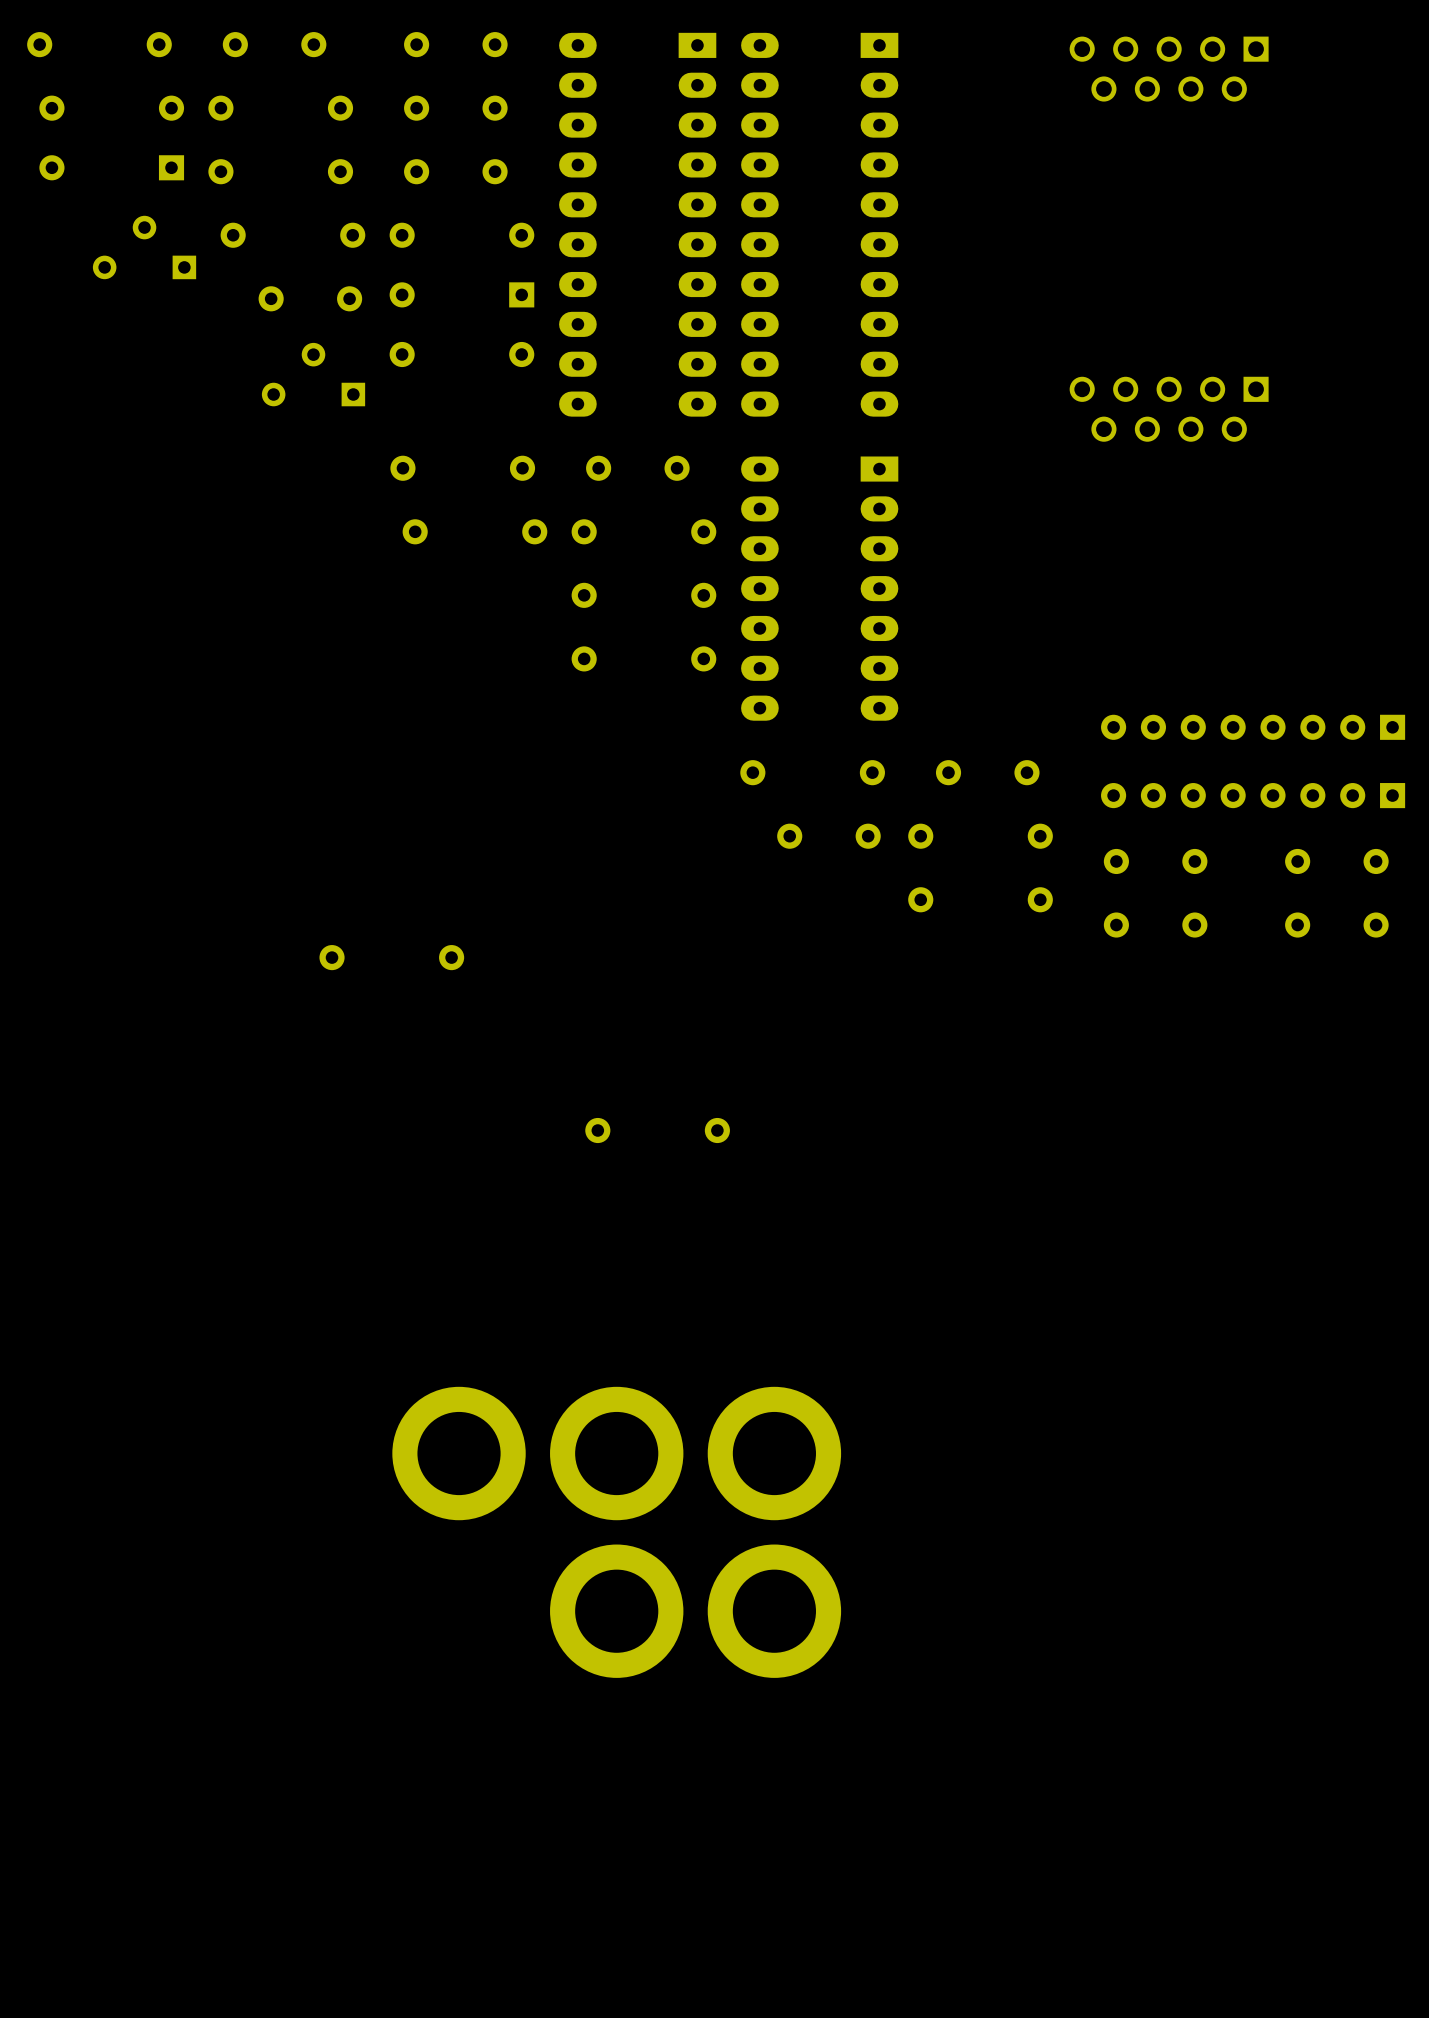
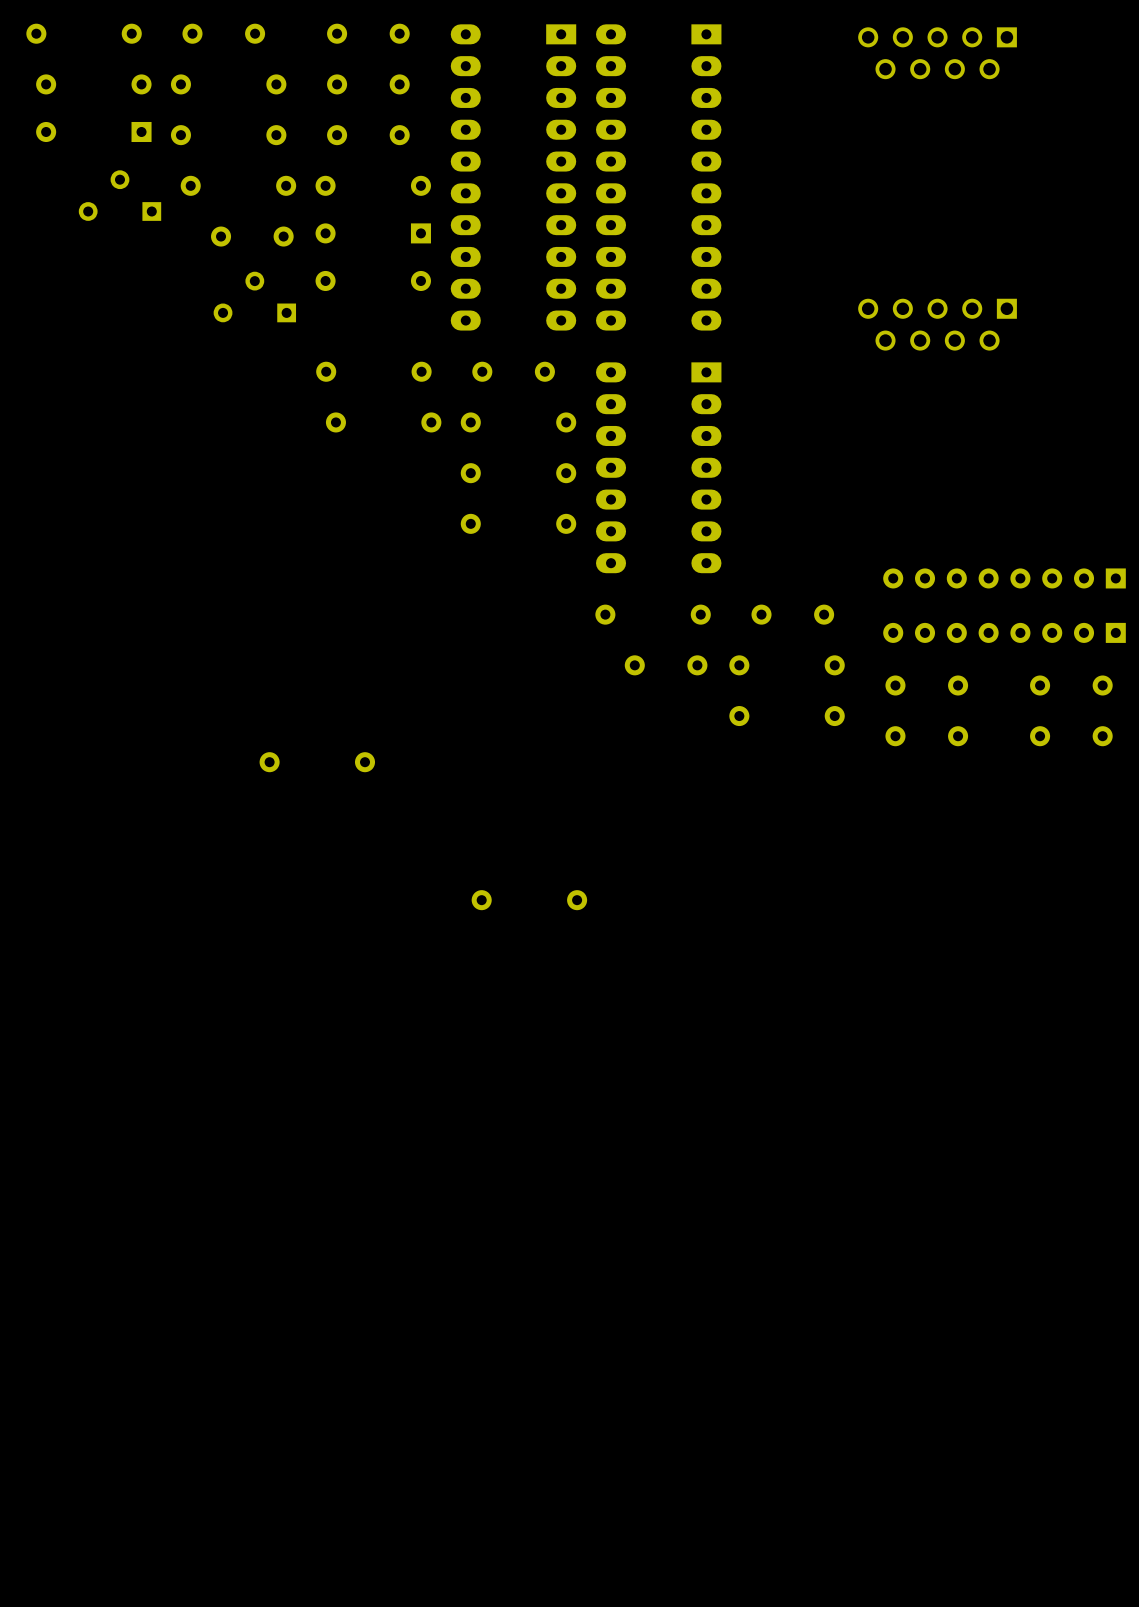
part: (459, 1453) -> none
part: (616, 1453) -> none
part: (774, 1453) -> none
part: (616, 1611) -> none
part: (774, 1611) -> none

